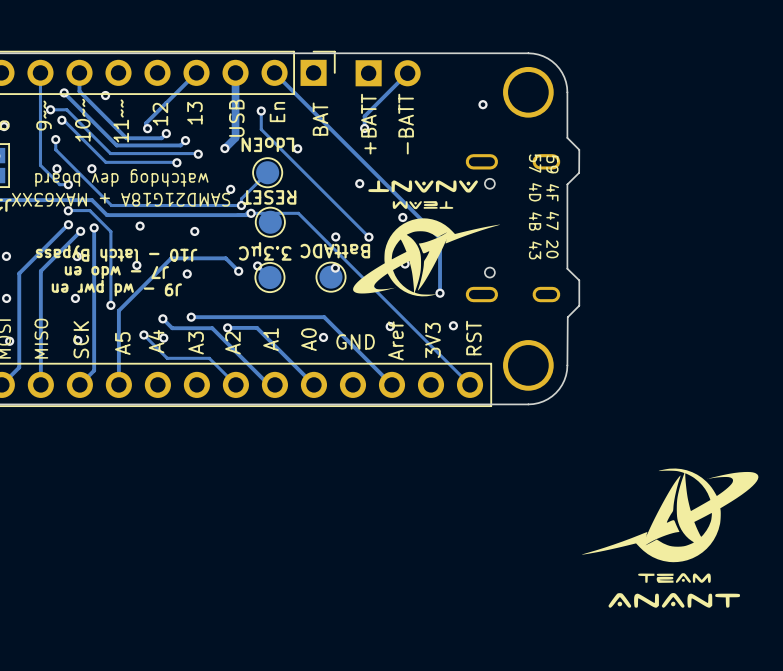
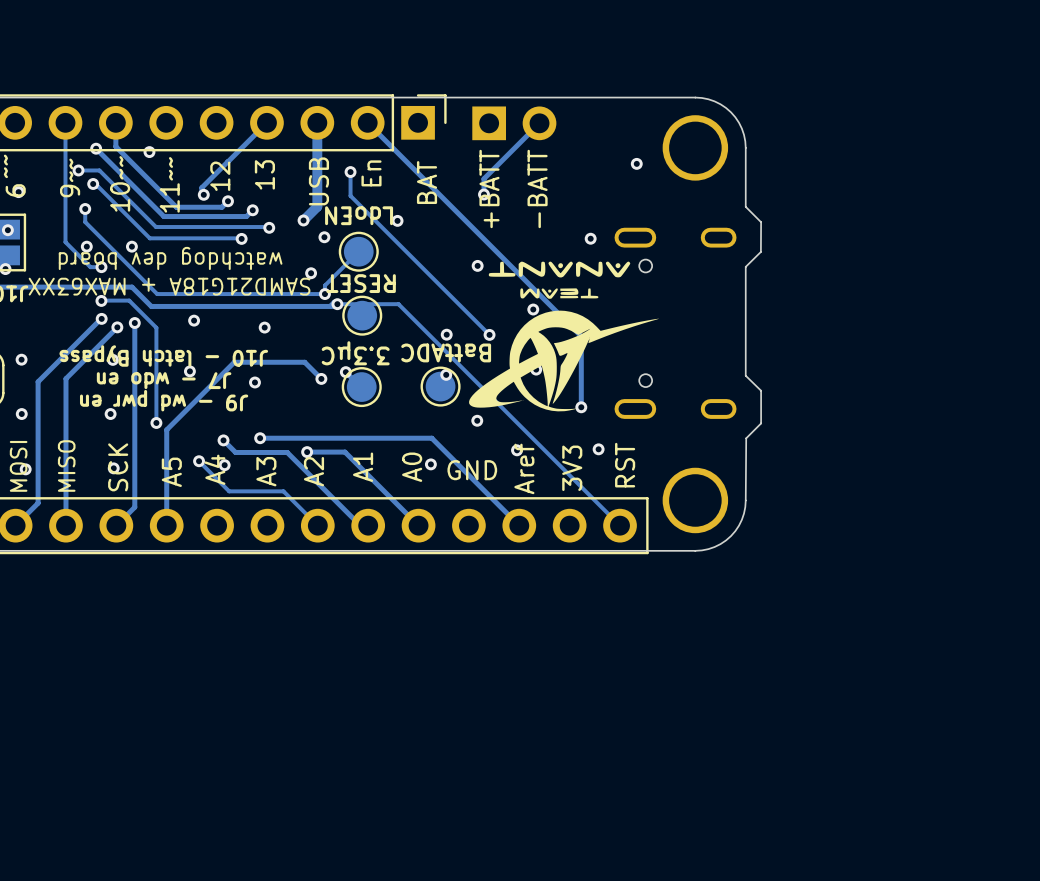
via: none -> (324, 237)
via: none -> (590, 238)
text: 57 4D 4B 43 (535, 206) -> none
text: 59 4F 47 20 (552, 206) -> none
via: none -> (477, 420)
drawing: [581, 468, 759, 608] -> none

